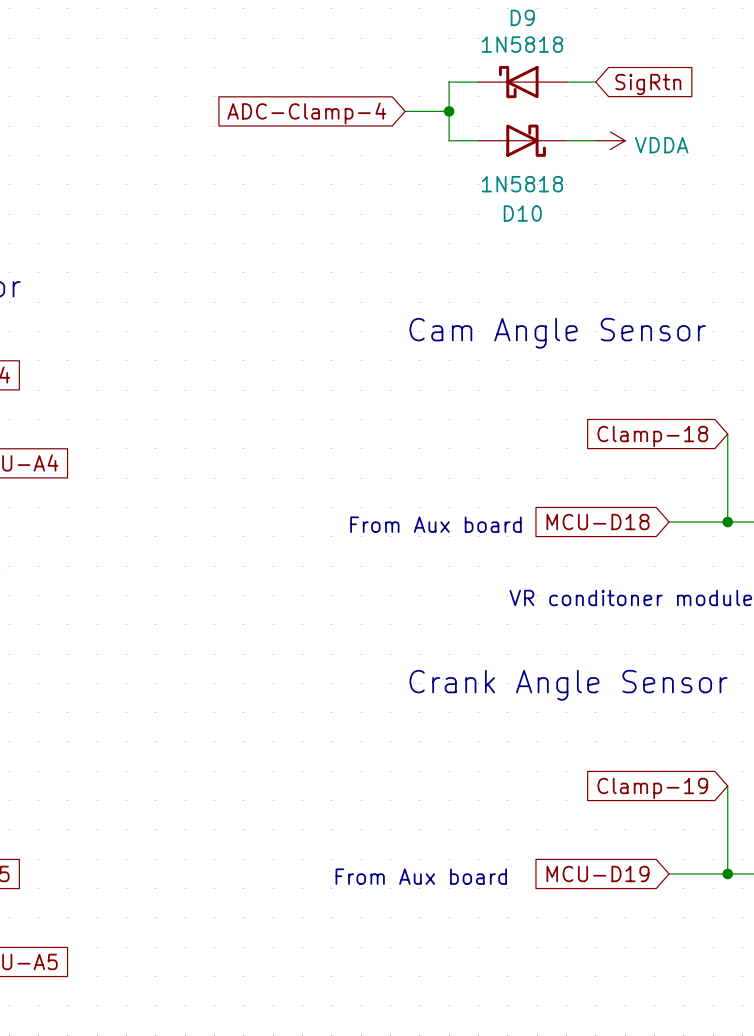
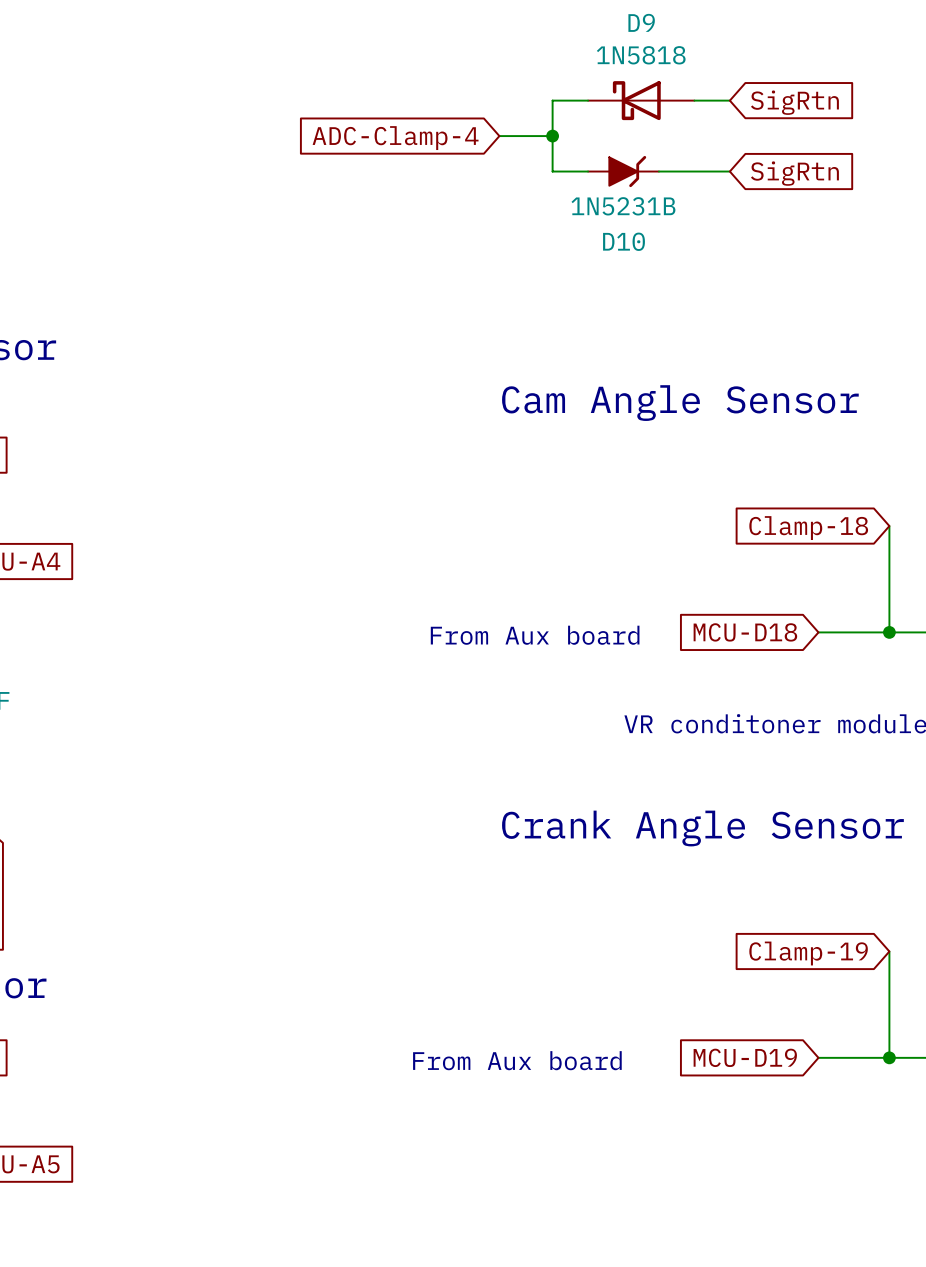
D10 symbol: [478, 124, 567, 157] -> [588, 155, 659, 188]
power symbol: VDDA (610, 140) -> none
global label: none -> SigRtn (794, 173)
D10 value: 1N5818 (522, 184) -> 1N5231B (623, 206)

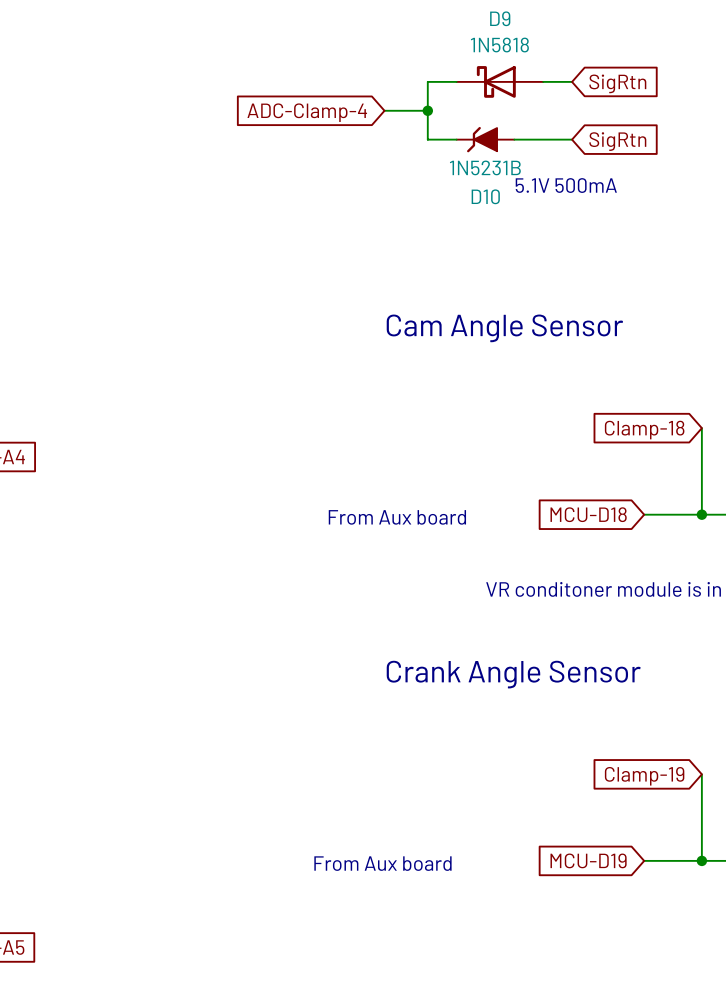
D10 rotation: 0° (627, 171) -> 180° (482, 139)
text: none -> 5.1V 500mA (566, 185)

